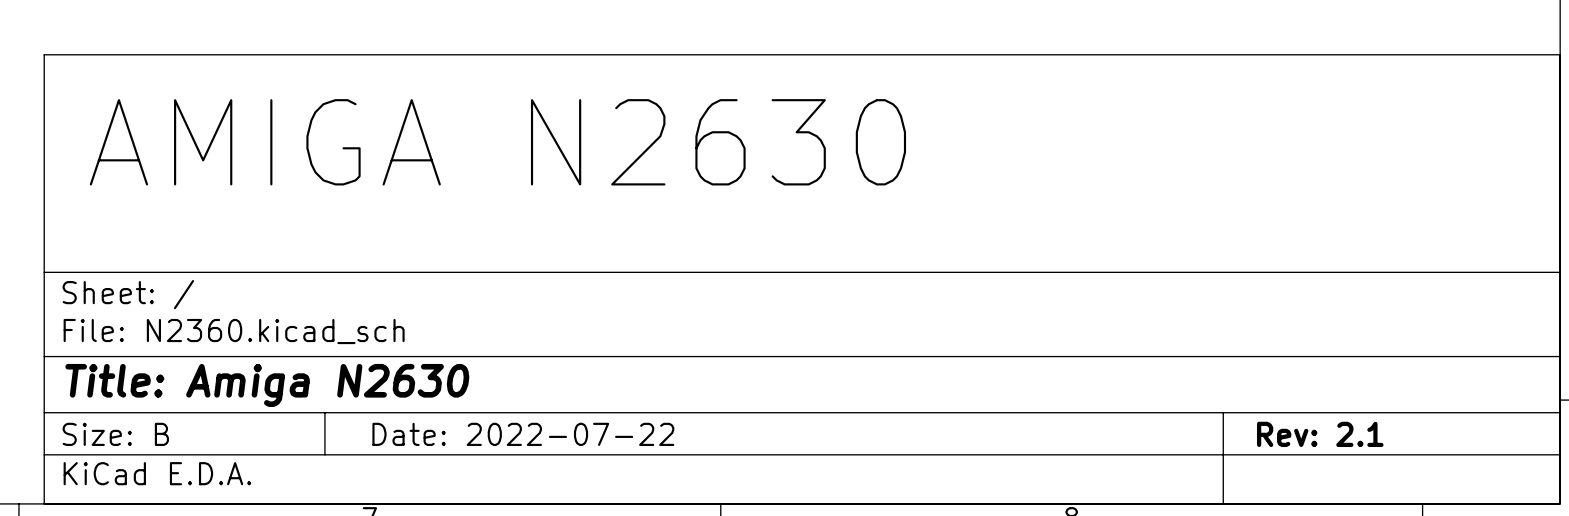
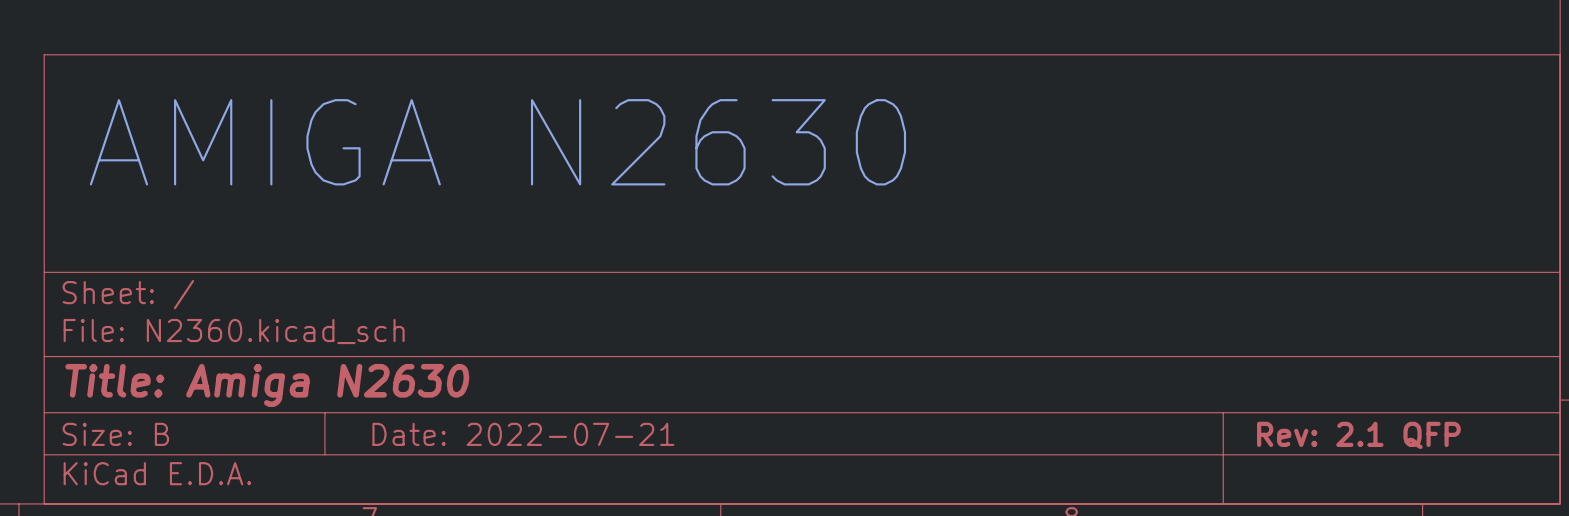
title block: Date: 2022-07-22 (523, 434) -> Date: 2022-07-21 (523, 434)
title block: Rev: 2.1 (1320, 434) -> Rev: 2.1 QFP (1358, 435)

